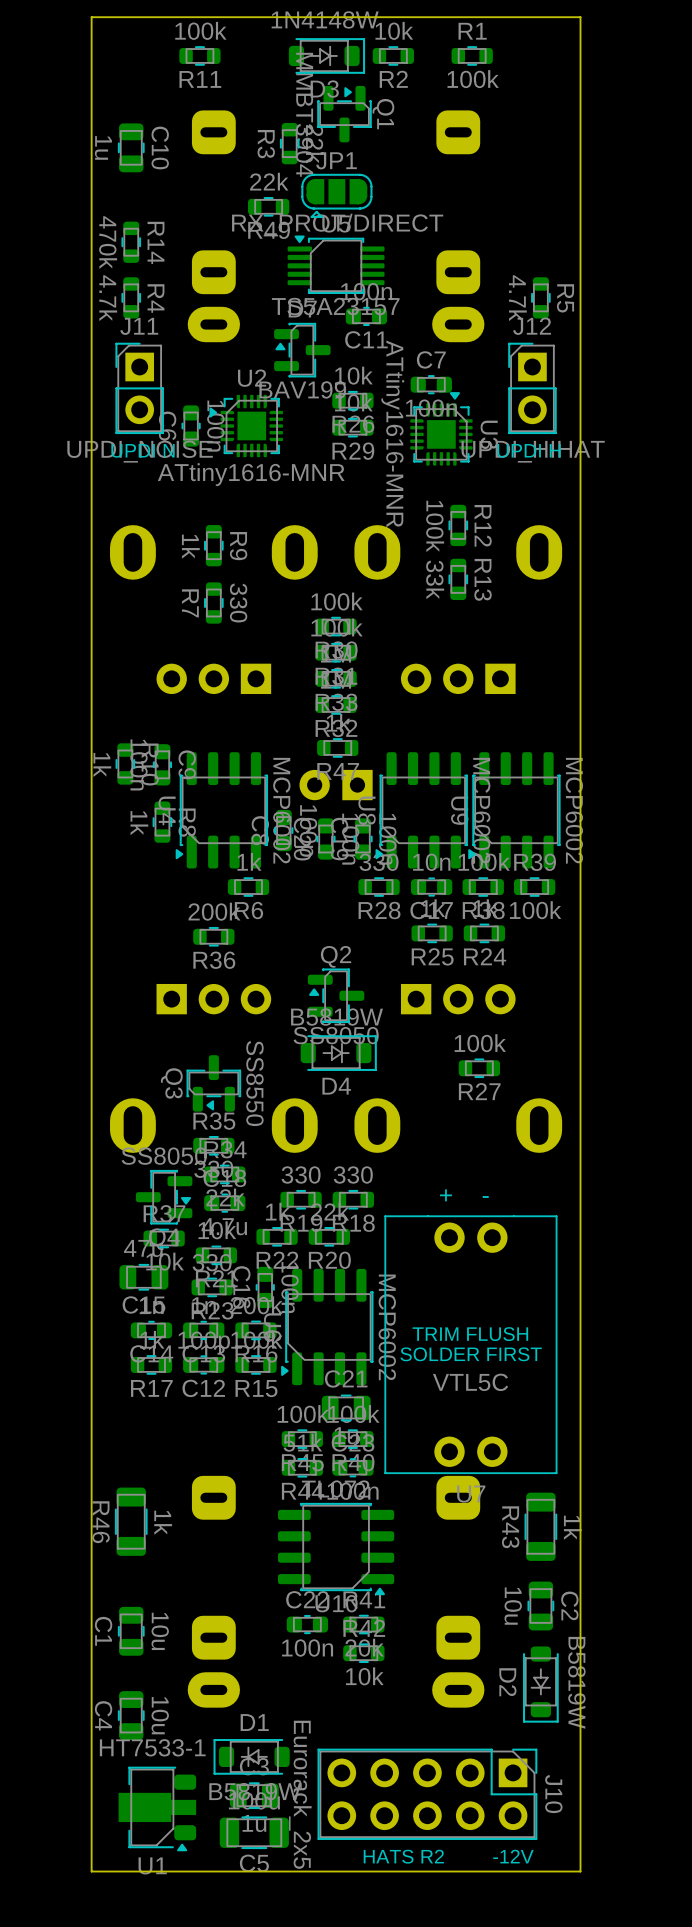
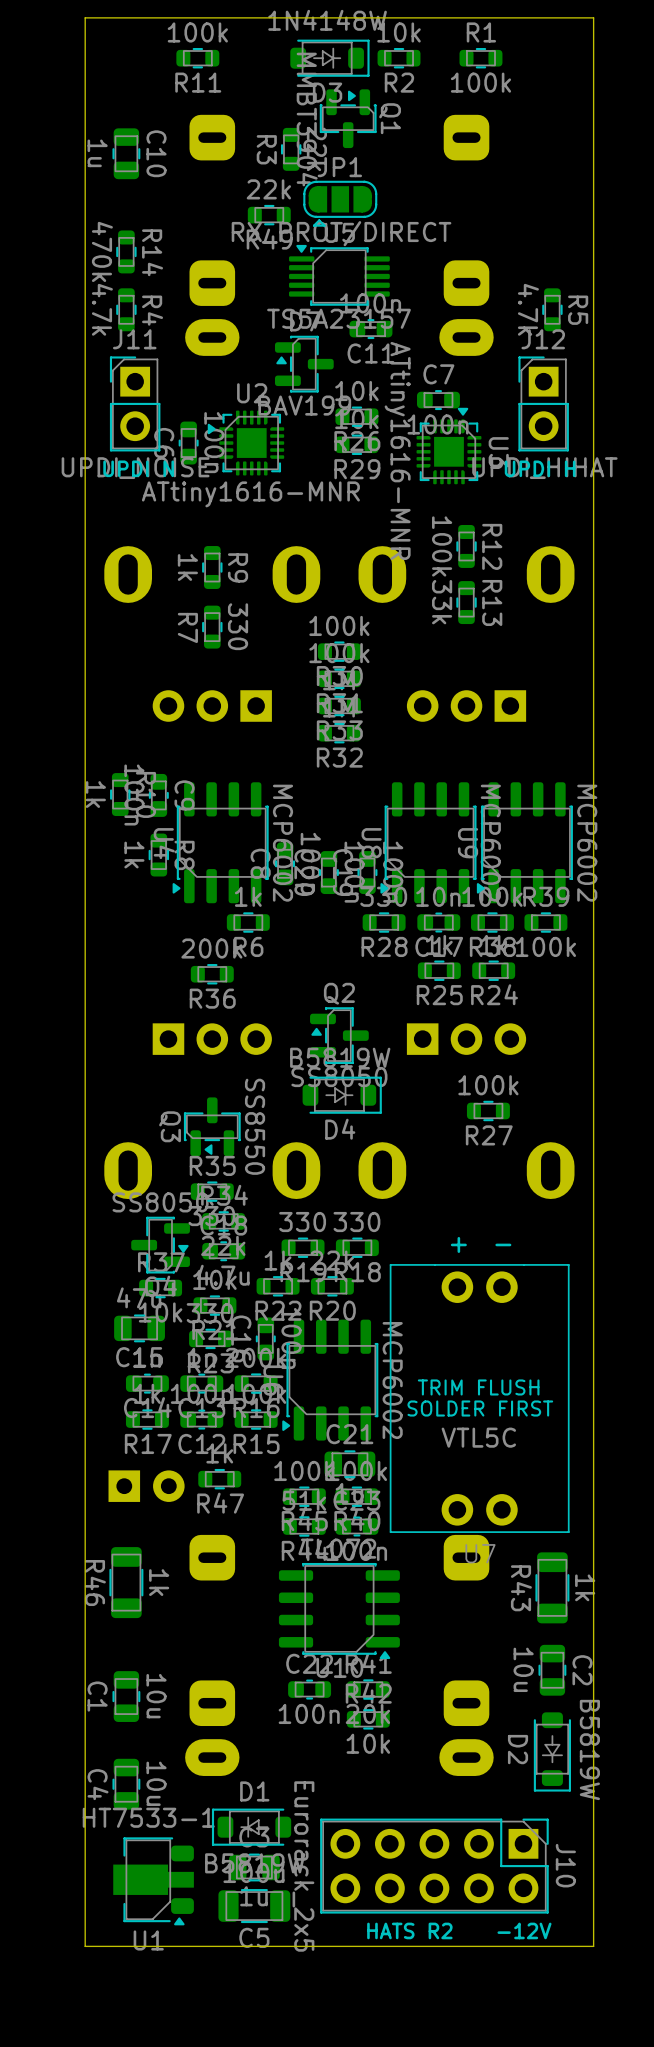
R47 position: (337, 747) -> (219, 1479)
part: (336, 785) -> none
part: none -> (146, 1486)

